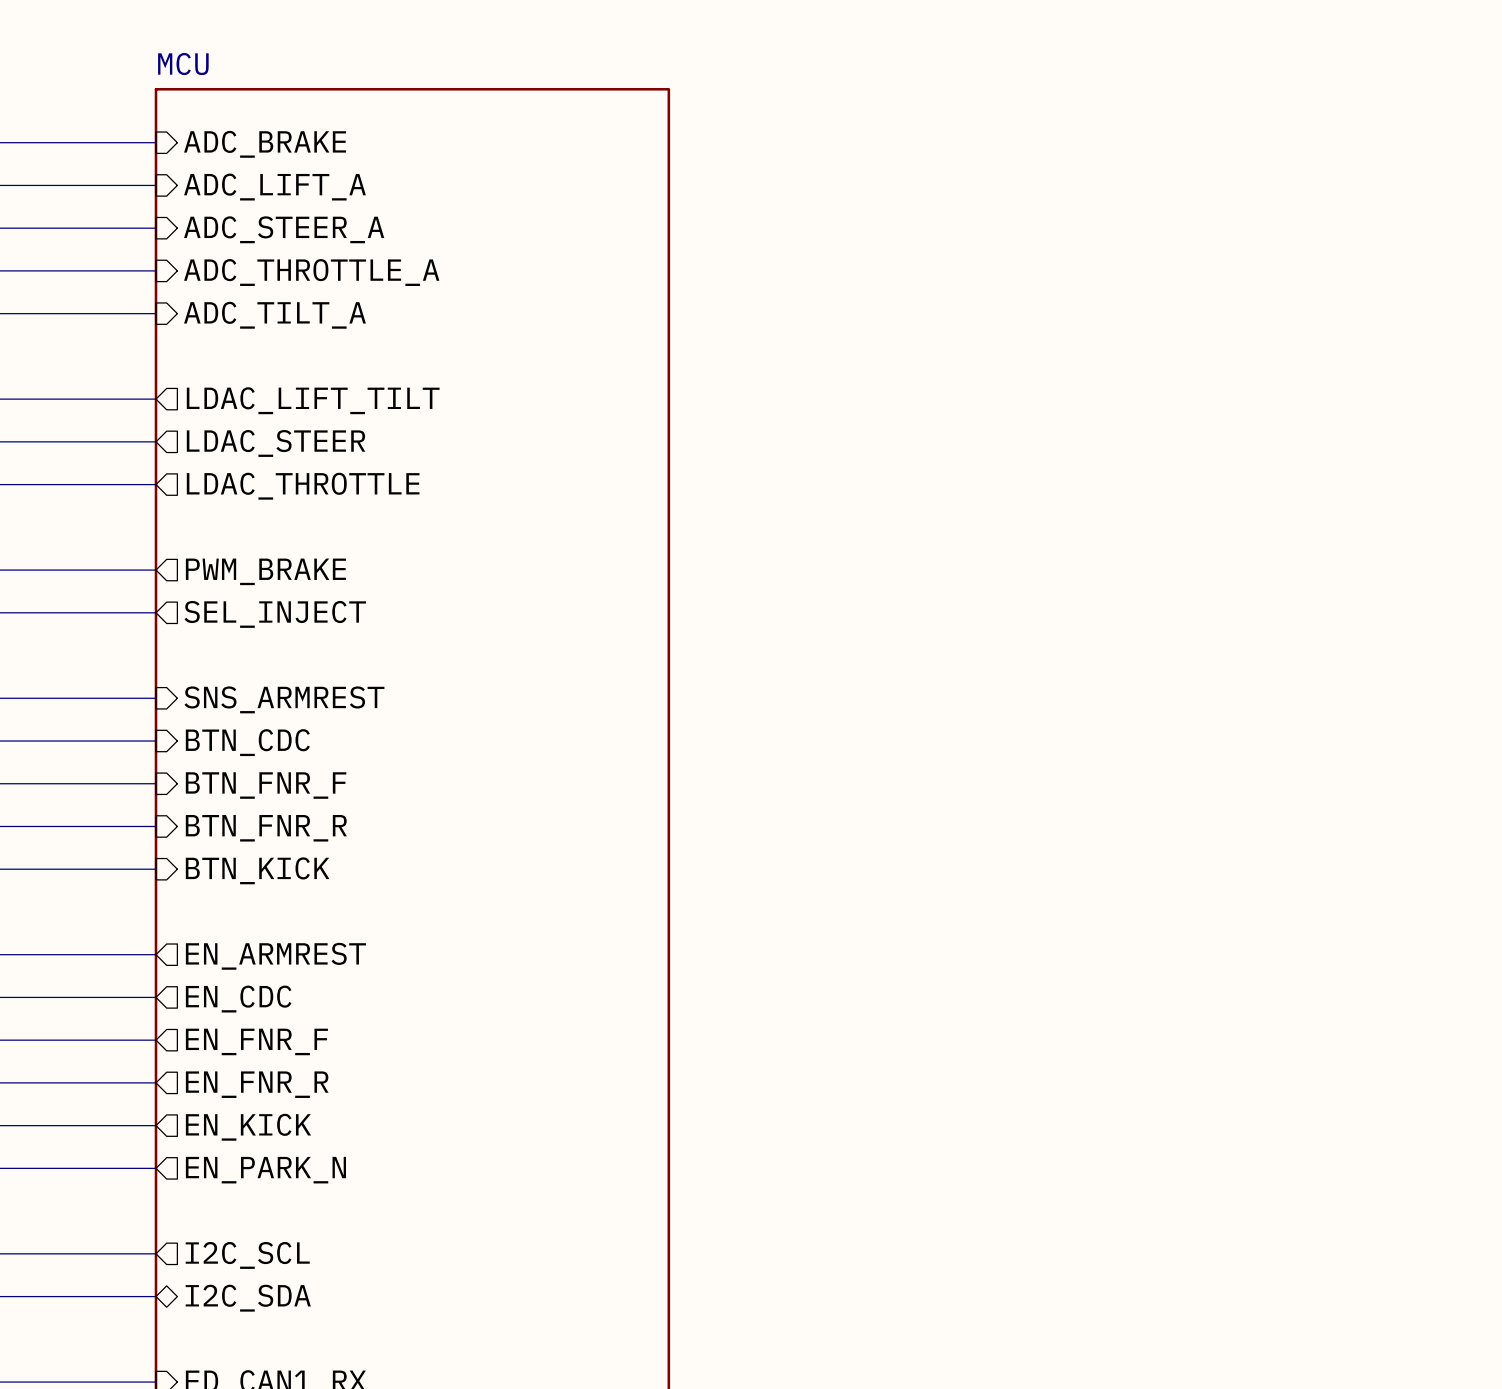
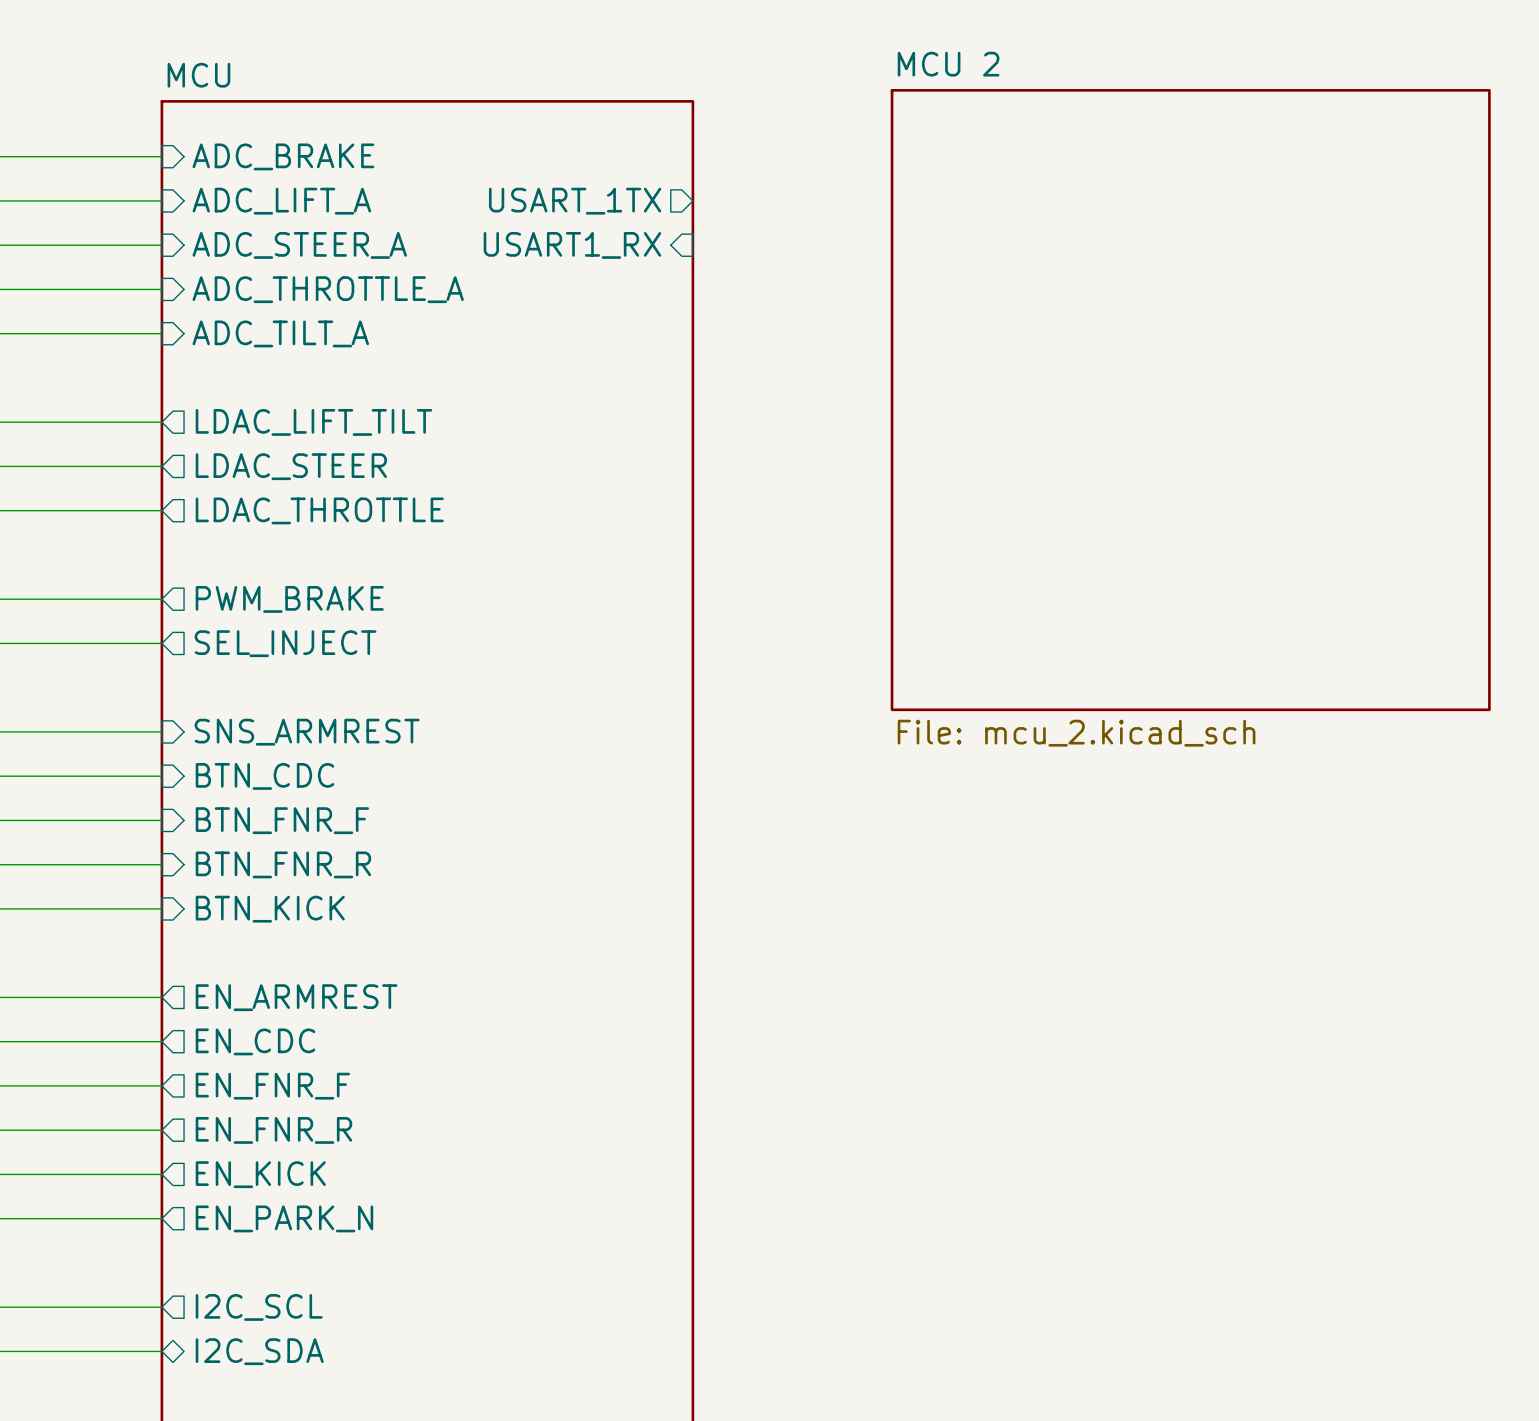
sheet pin: none -> USART_1TX (575, 201)
sheet pin: none -> USART1_RX (572, 245)
sheet MCU 2: none -> File: mcu_2.kicad_sch (1190, 400)

